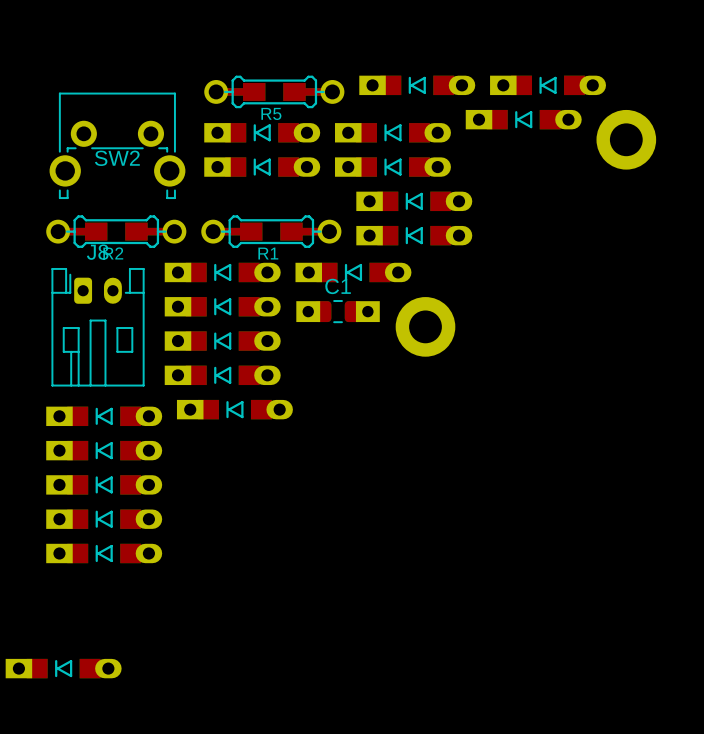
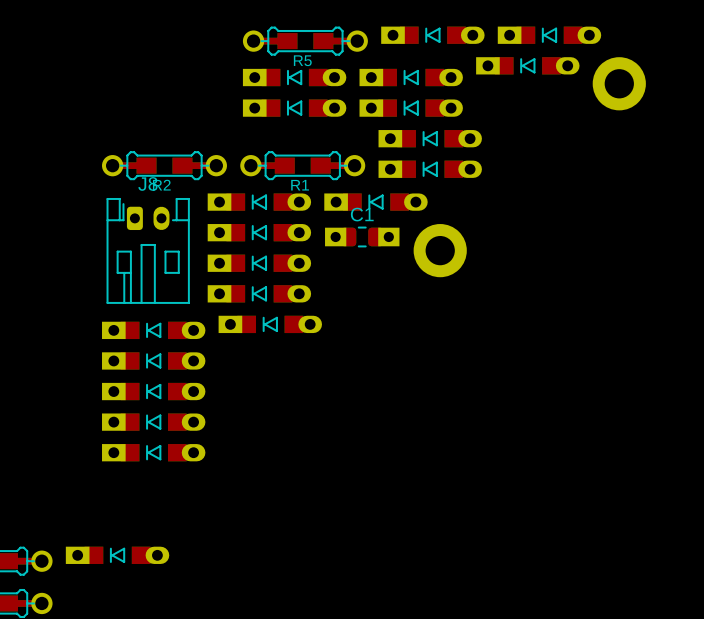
SW2: (117, 145) -> none

